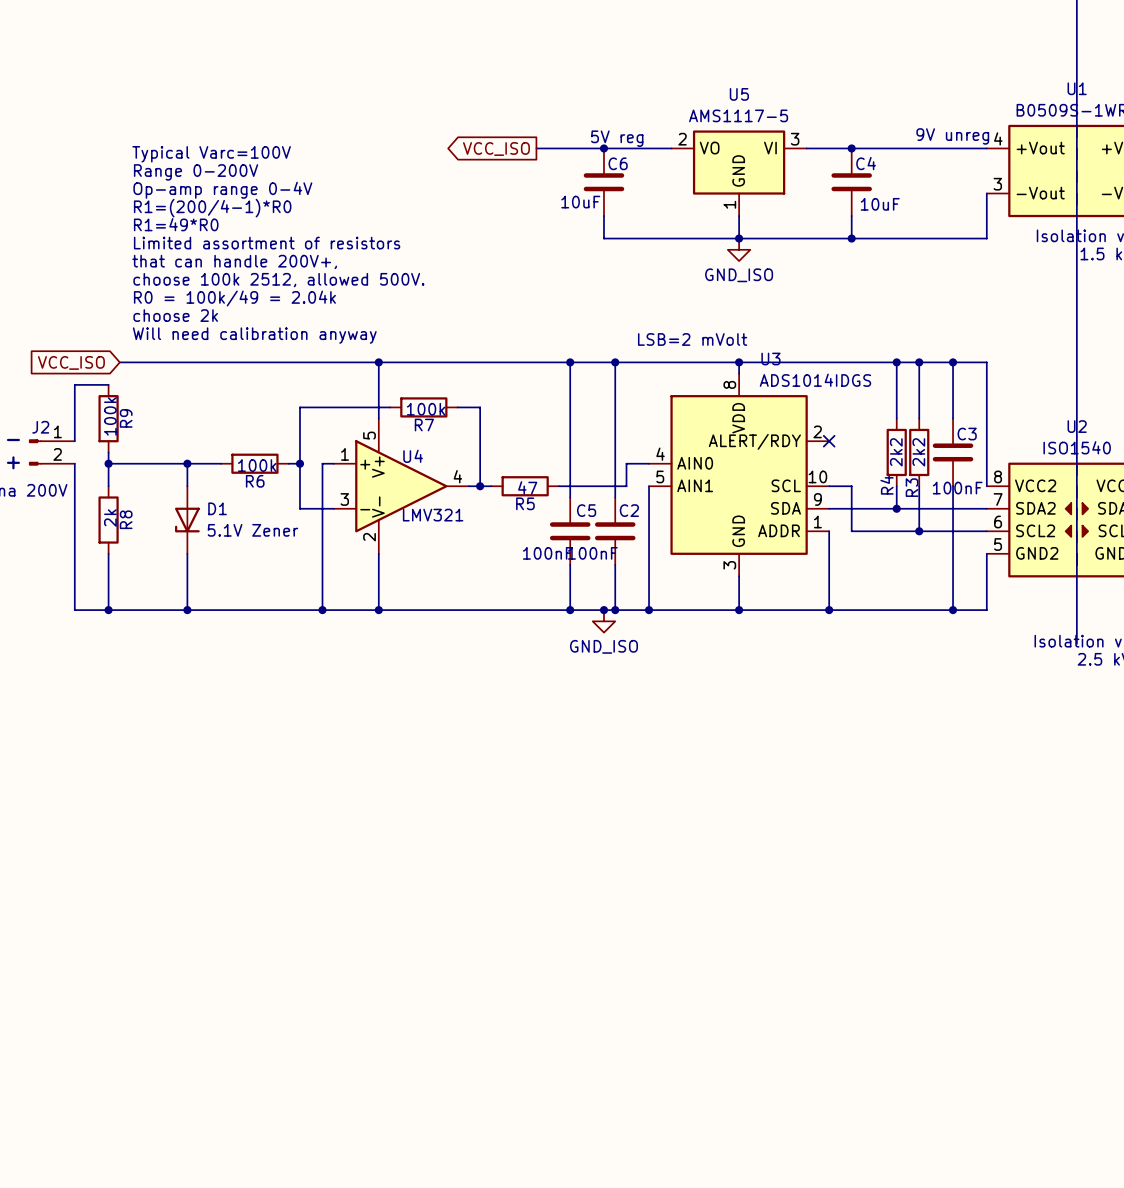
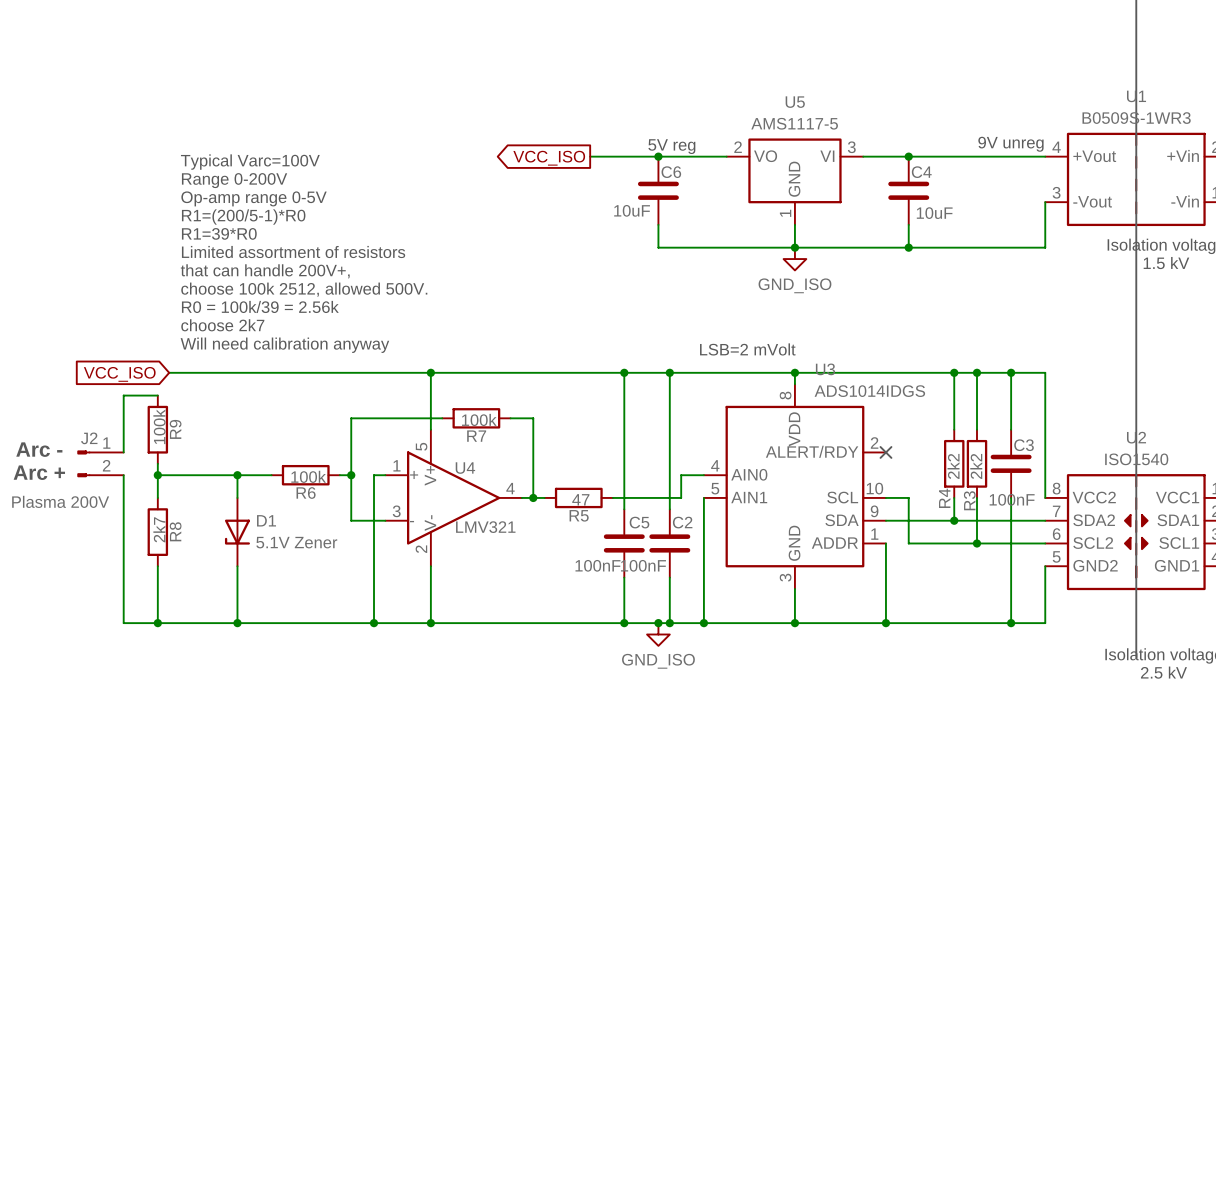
text: Op-amp range 0-4V (222, 190) -> Op-amp range 0-5V (254, 198)
text: R1=(200/4-1)*R0 (212, 208) -> R1=(200/5-1)*R0 (243, 217)
text: R1=49*R0 (176, 224) -> R1=39*R0 (219, 233)
text: R0 = 100k/49 = 2.04k (234, 298) -> R0 = 100k/39 = 2.56k (260, 306)
text: choose 2k (175, 315) -> choose 2k7 (222, 325)
R8 value: 2k (110, 518) -> 2k7 (159, 529)

